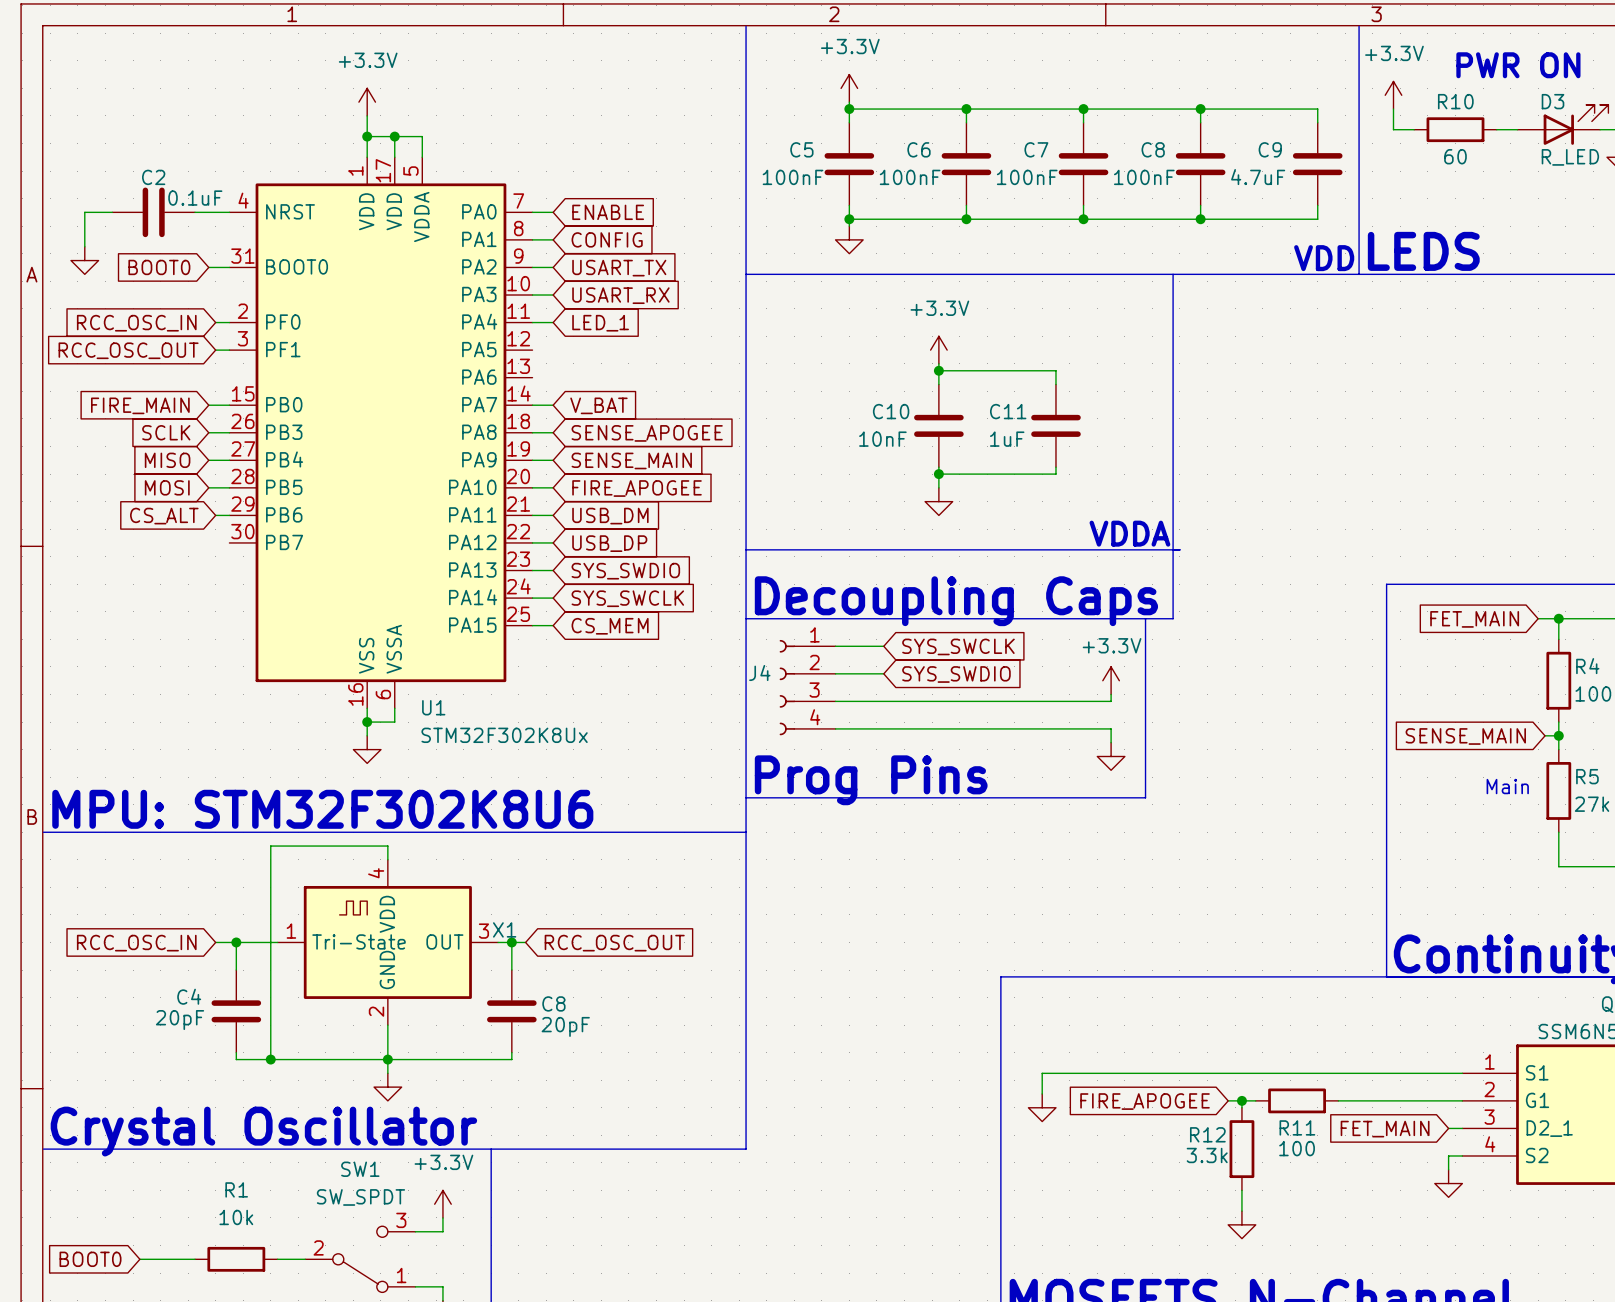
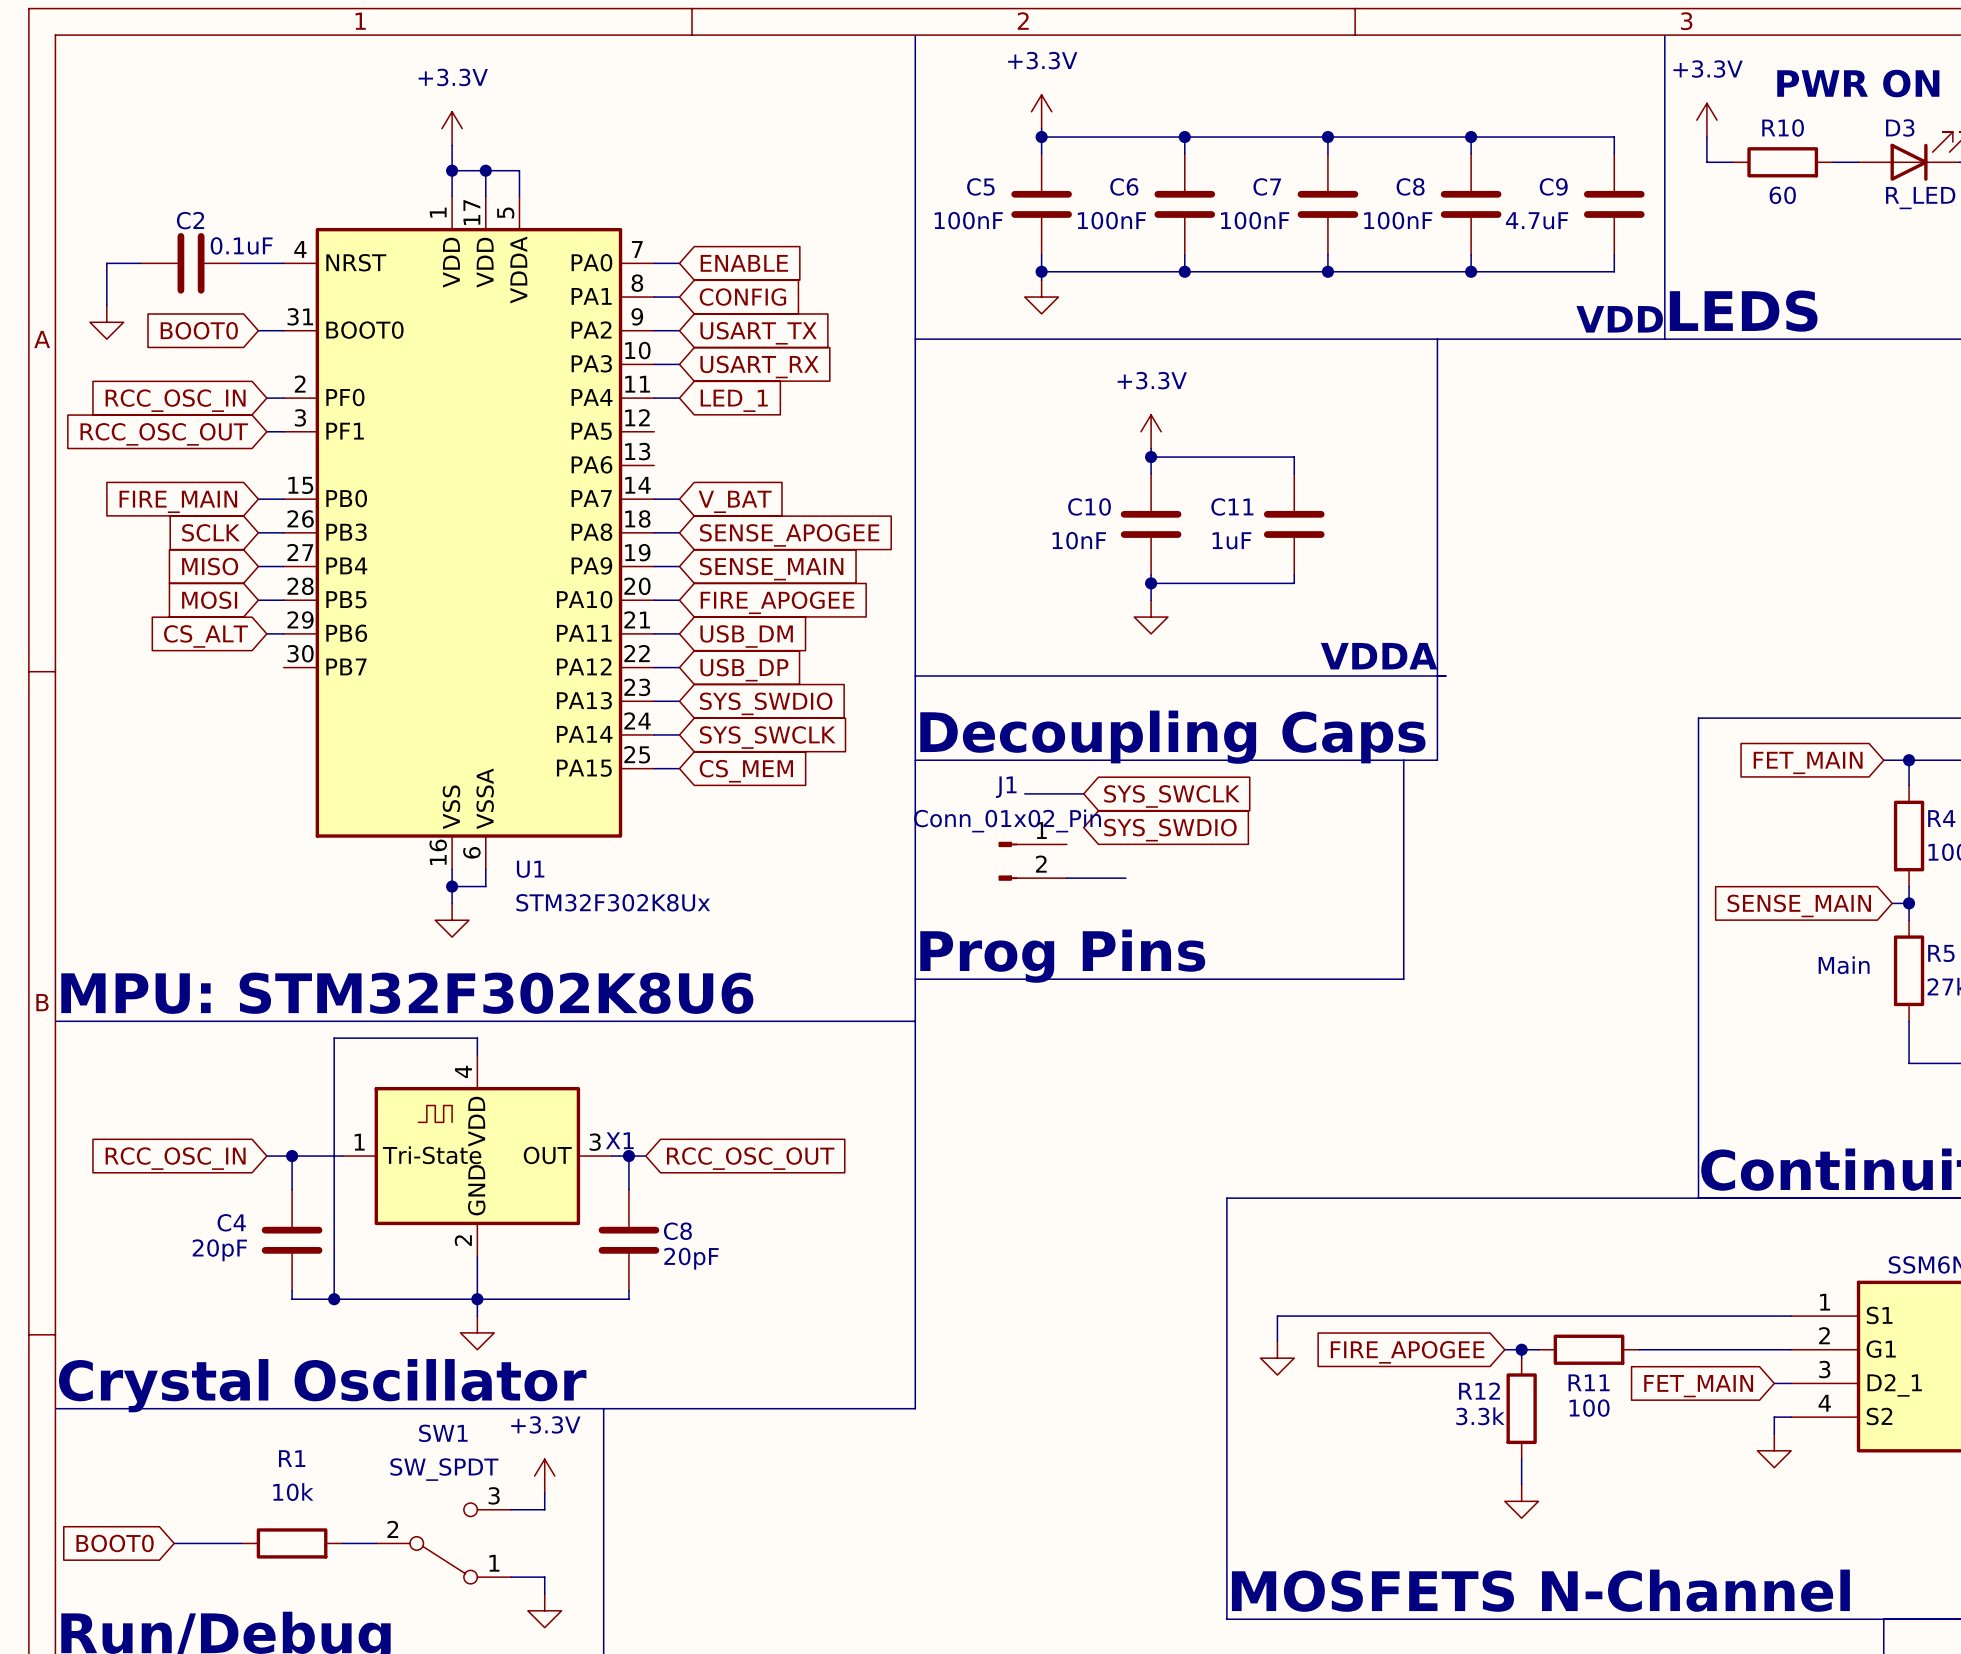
wire: (835, 673) (883, 673) -> (1066, 878) (1125, 878)
power symbol: +3.3V (1111, 680) -> none
J4: (807, 687) -> none
wire: (1111, 694) (1111, 701) (835, 701) -> none
J1: none -> Conn_01x02_Pin (1032, 861)
wire: (835, 728) (1111, 728) (1111, 742) -> none
power symbol: (1111, 756) -> none

